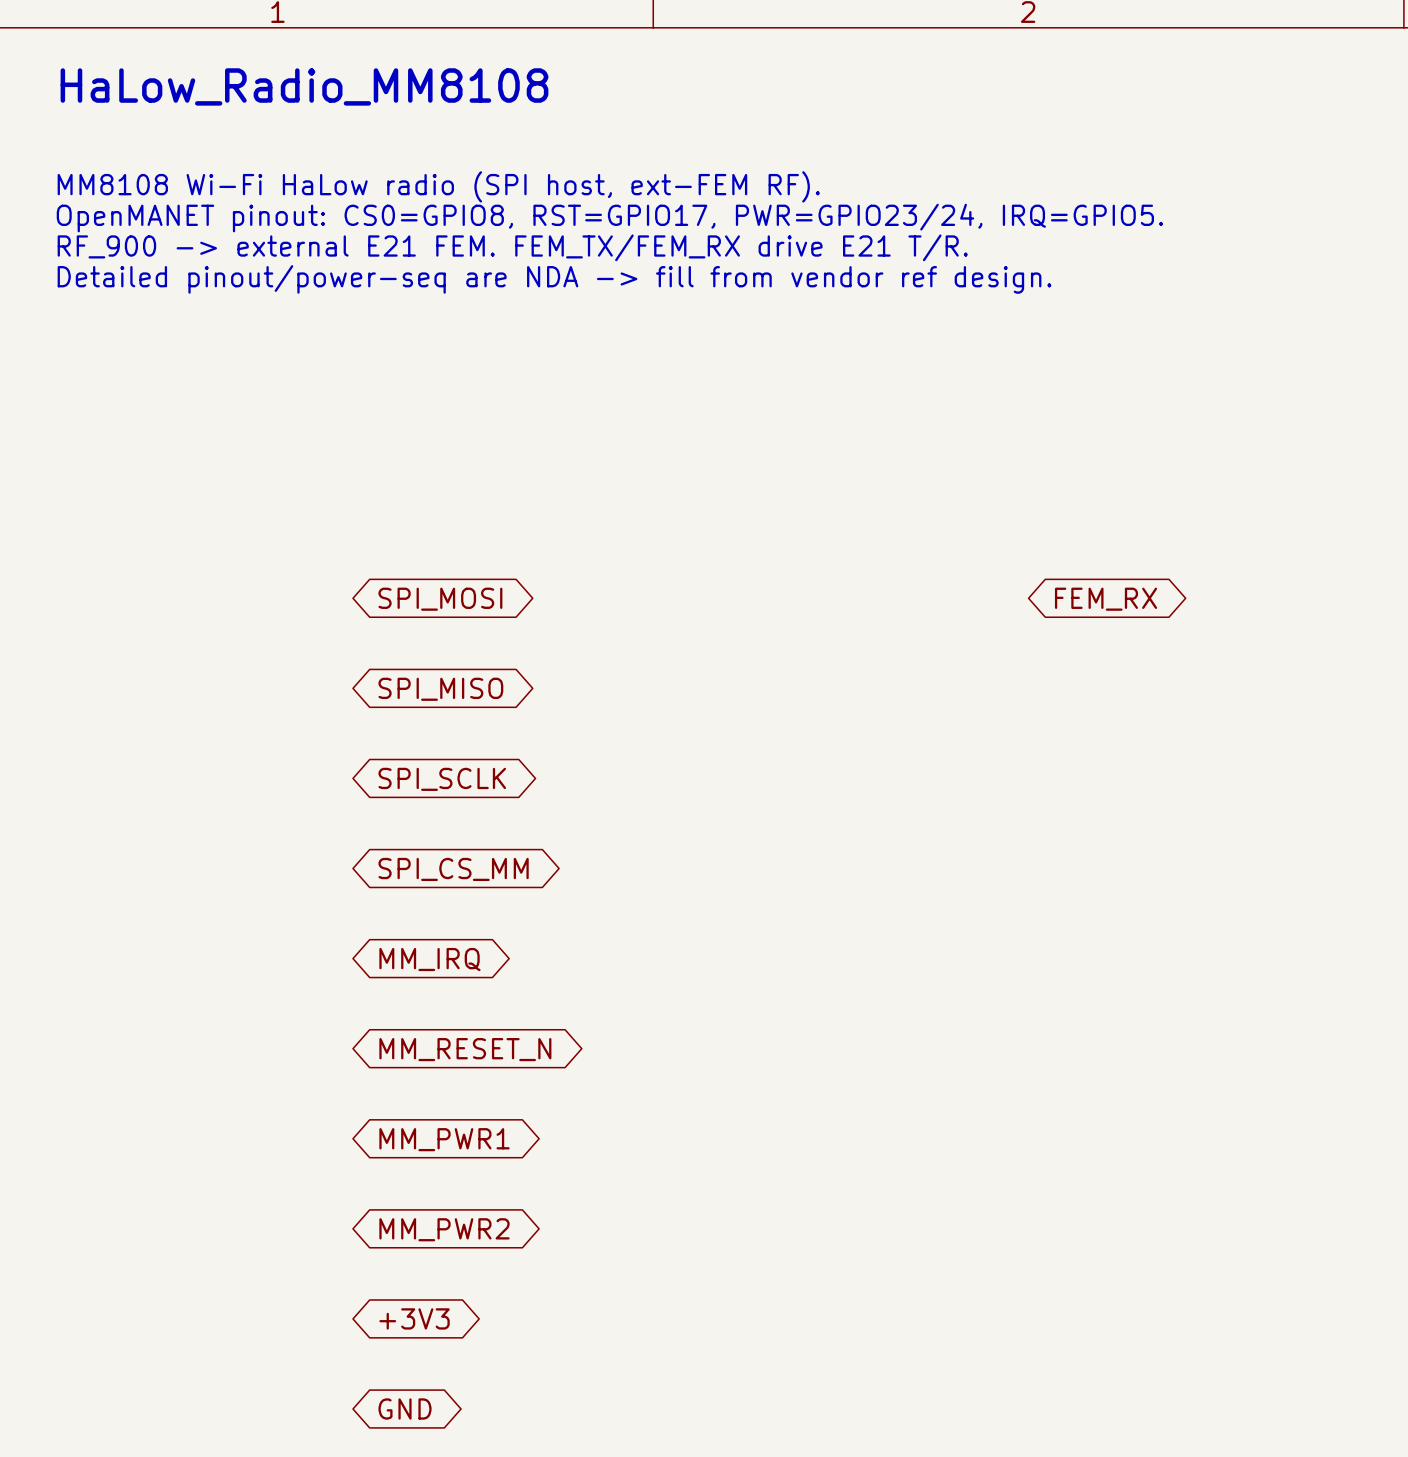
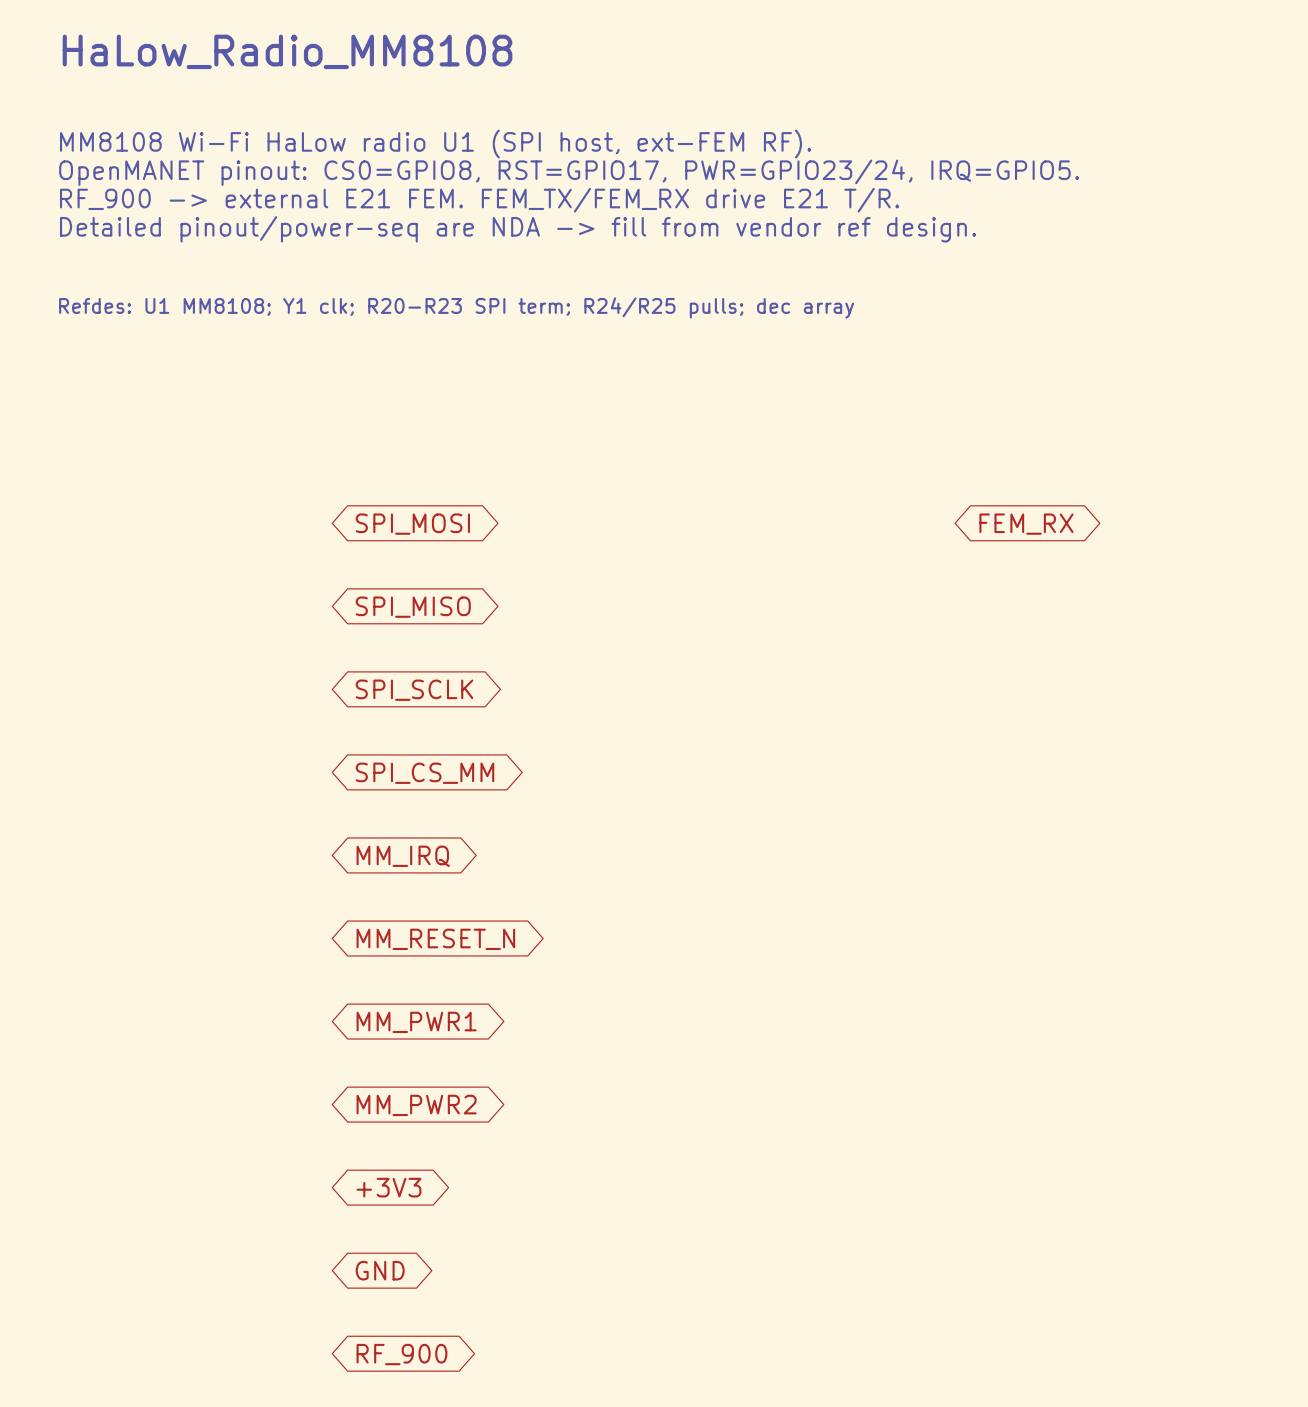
text: MM8108 Wi-Fi HaLow radio (SPI host, ext-FEM RF). (438, 186) -> MM8108 Wi-Fi HaLow radio U1 (SPI host, ext-FEM RF). (435, 144)
text: none -> Refdes: U1 MM8108; Y1 clk; R20-R23 SPI term; R24/R25 pulls; dec array (456, 307)

